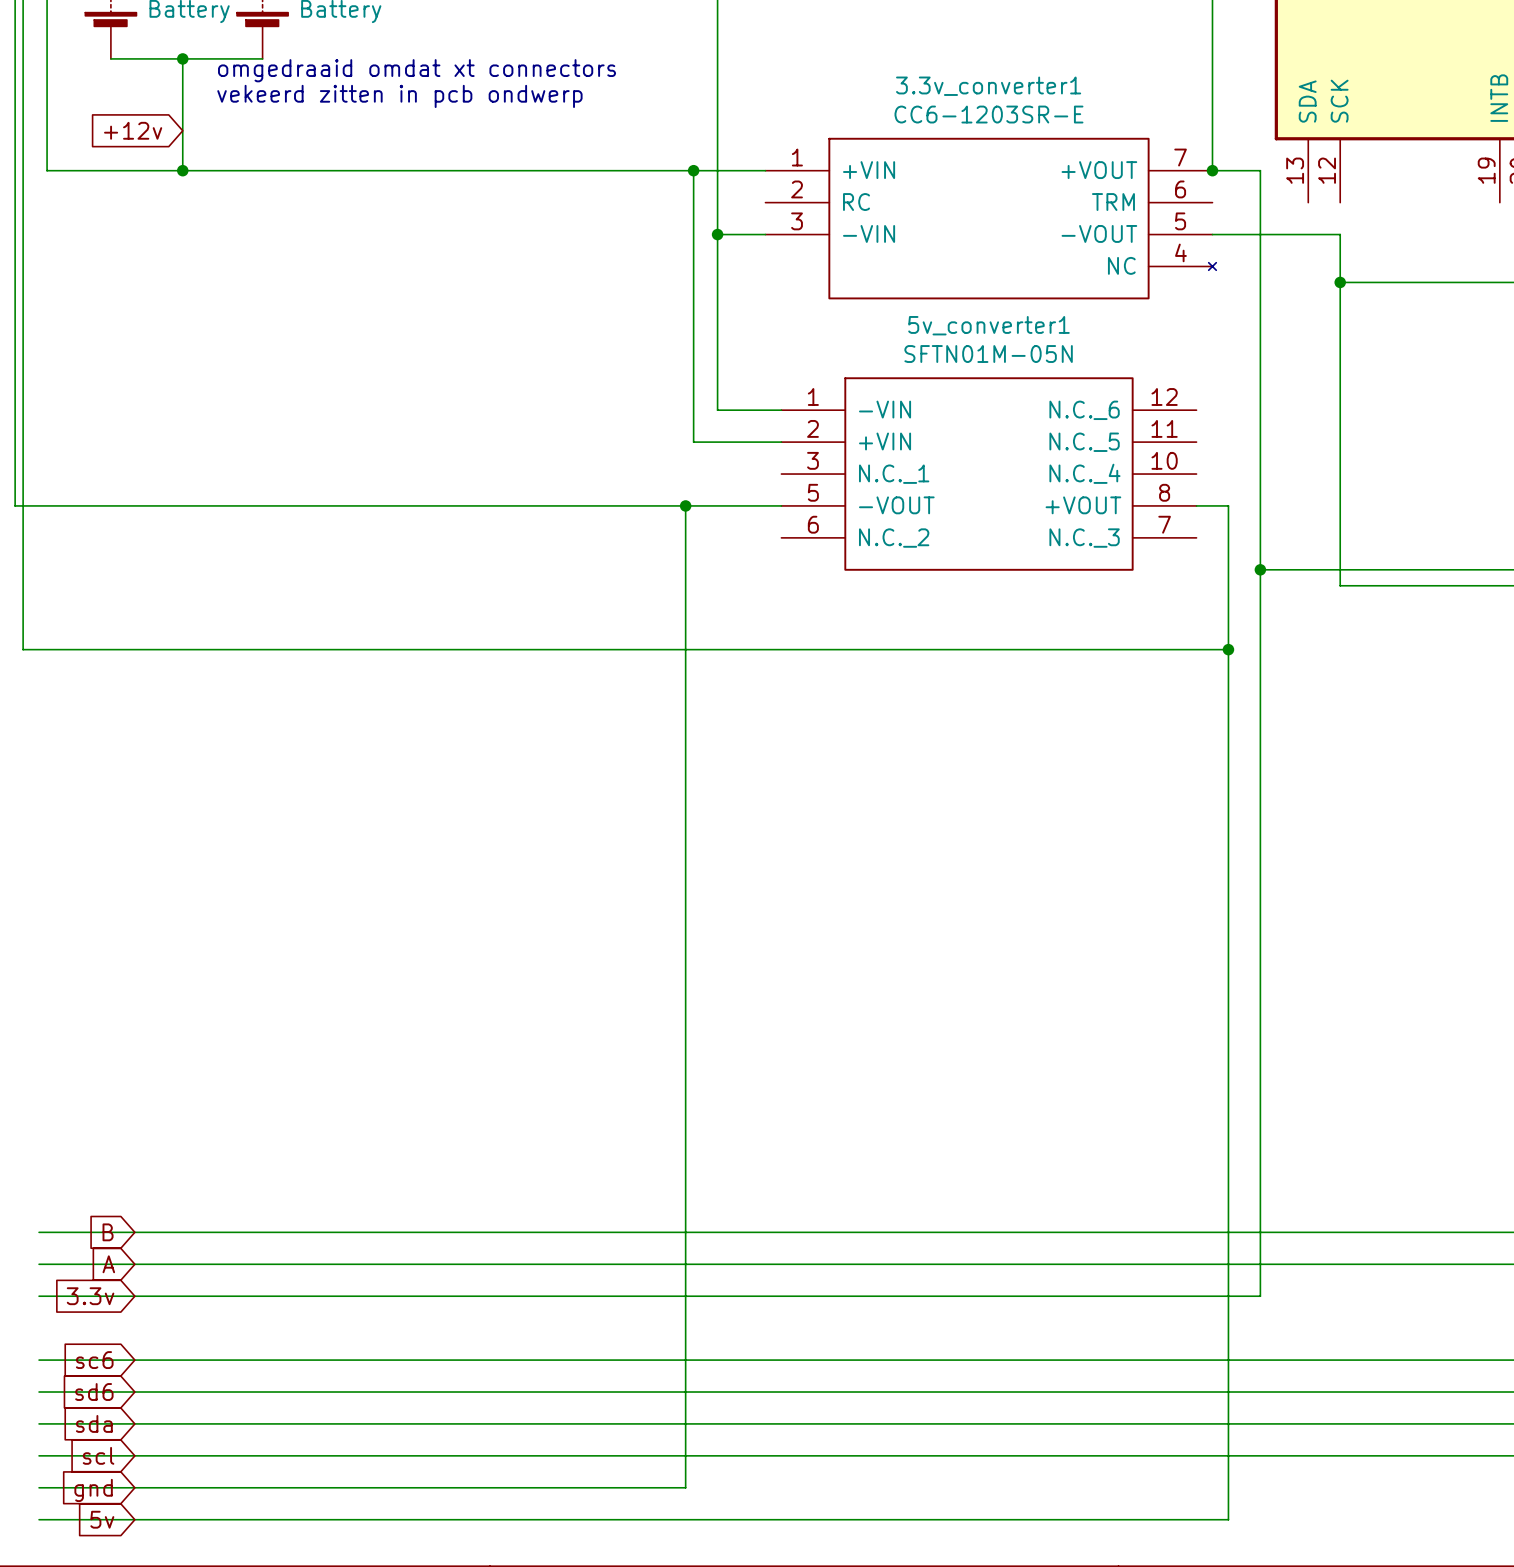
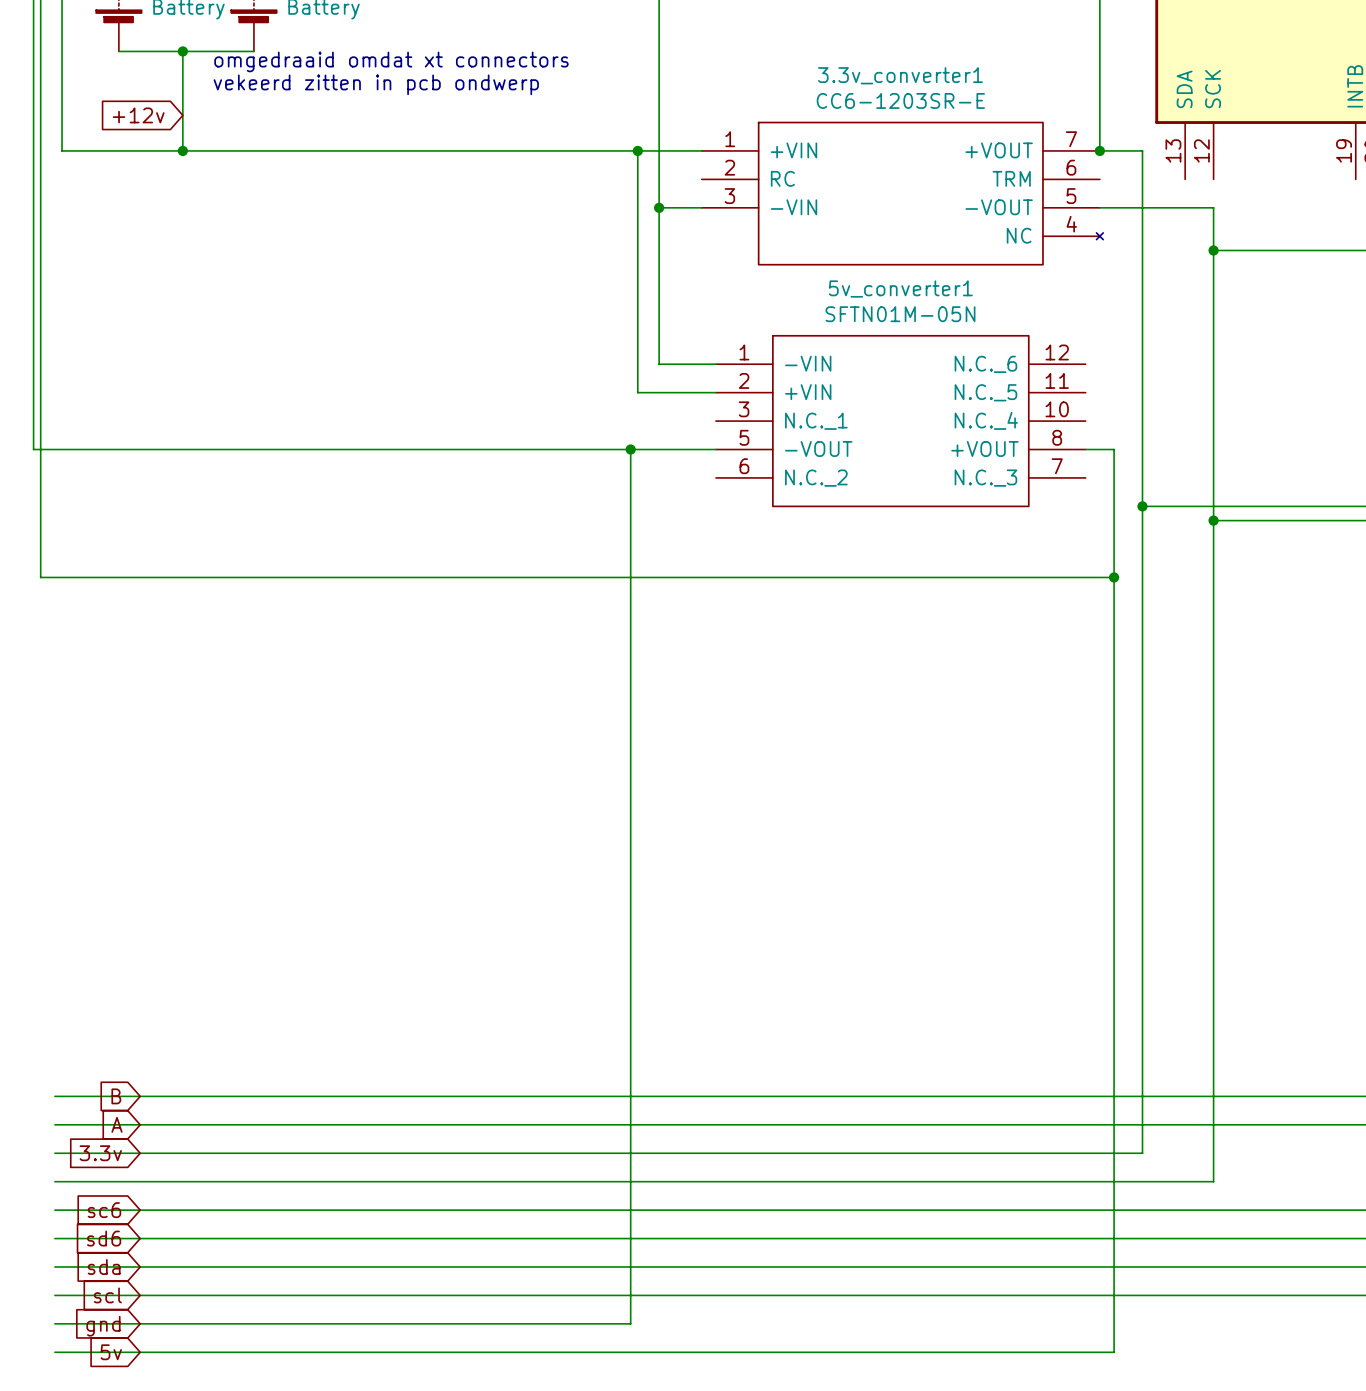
wire: none -> (1213, 520) (1213, 1181) (54, 1181)
junction: none -> (1213, 520)

